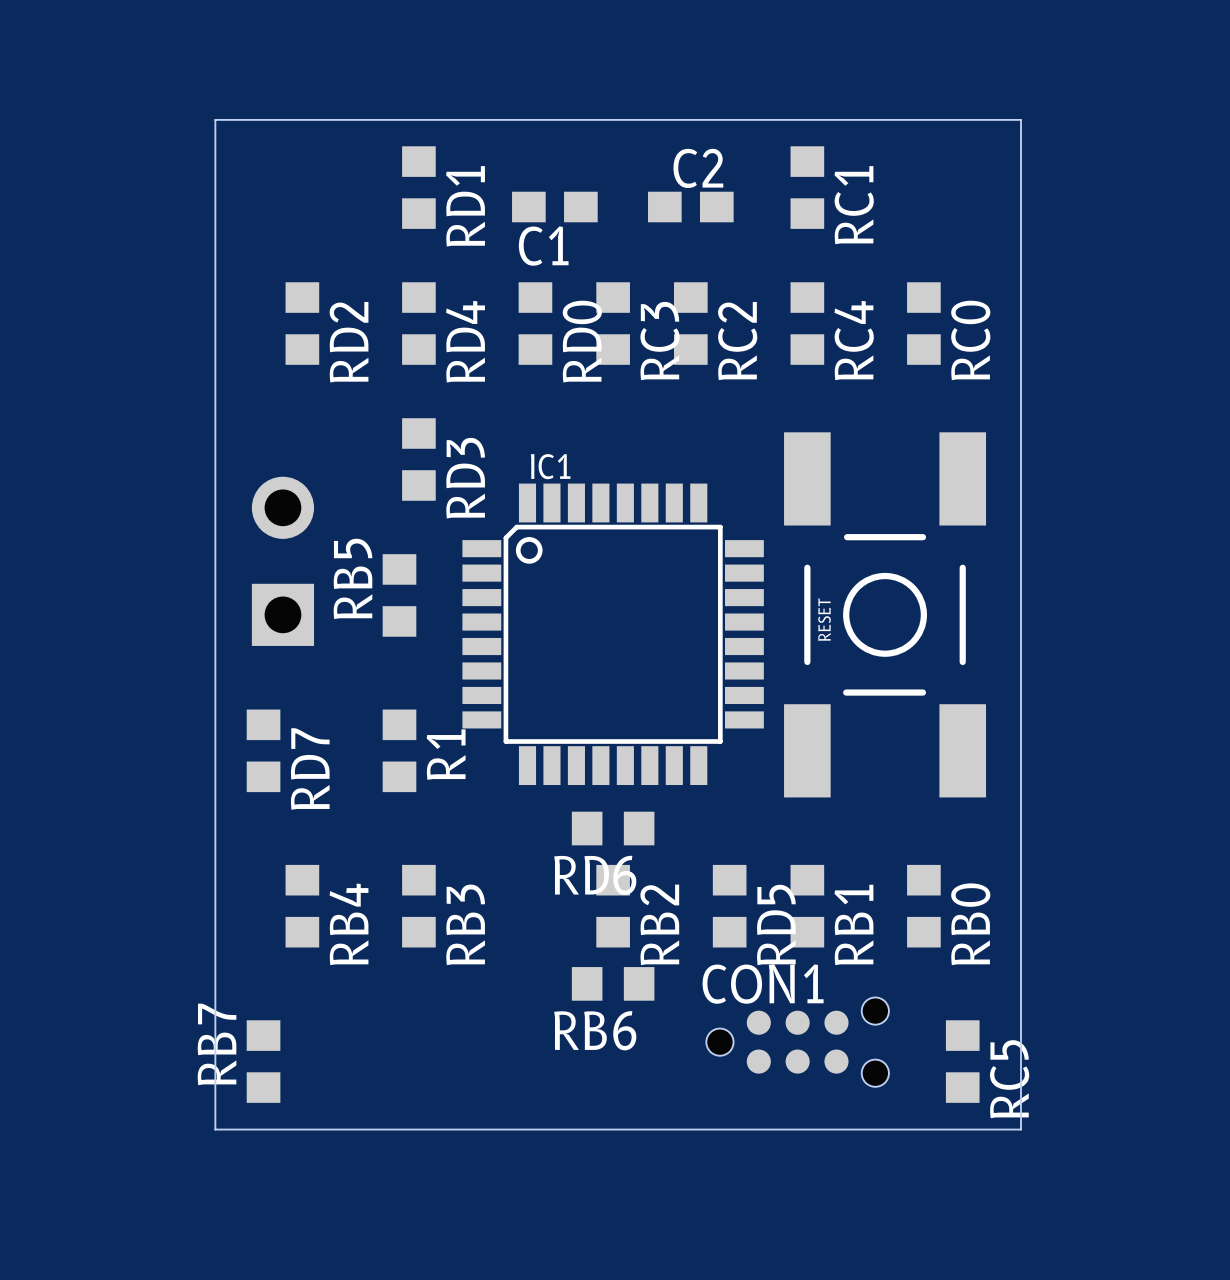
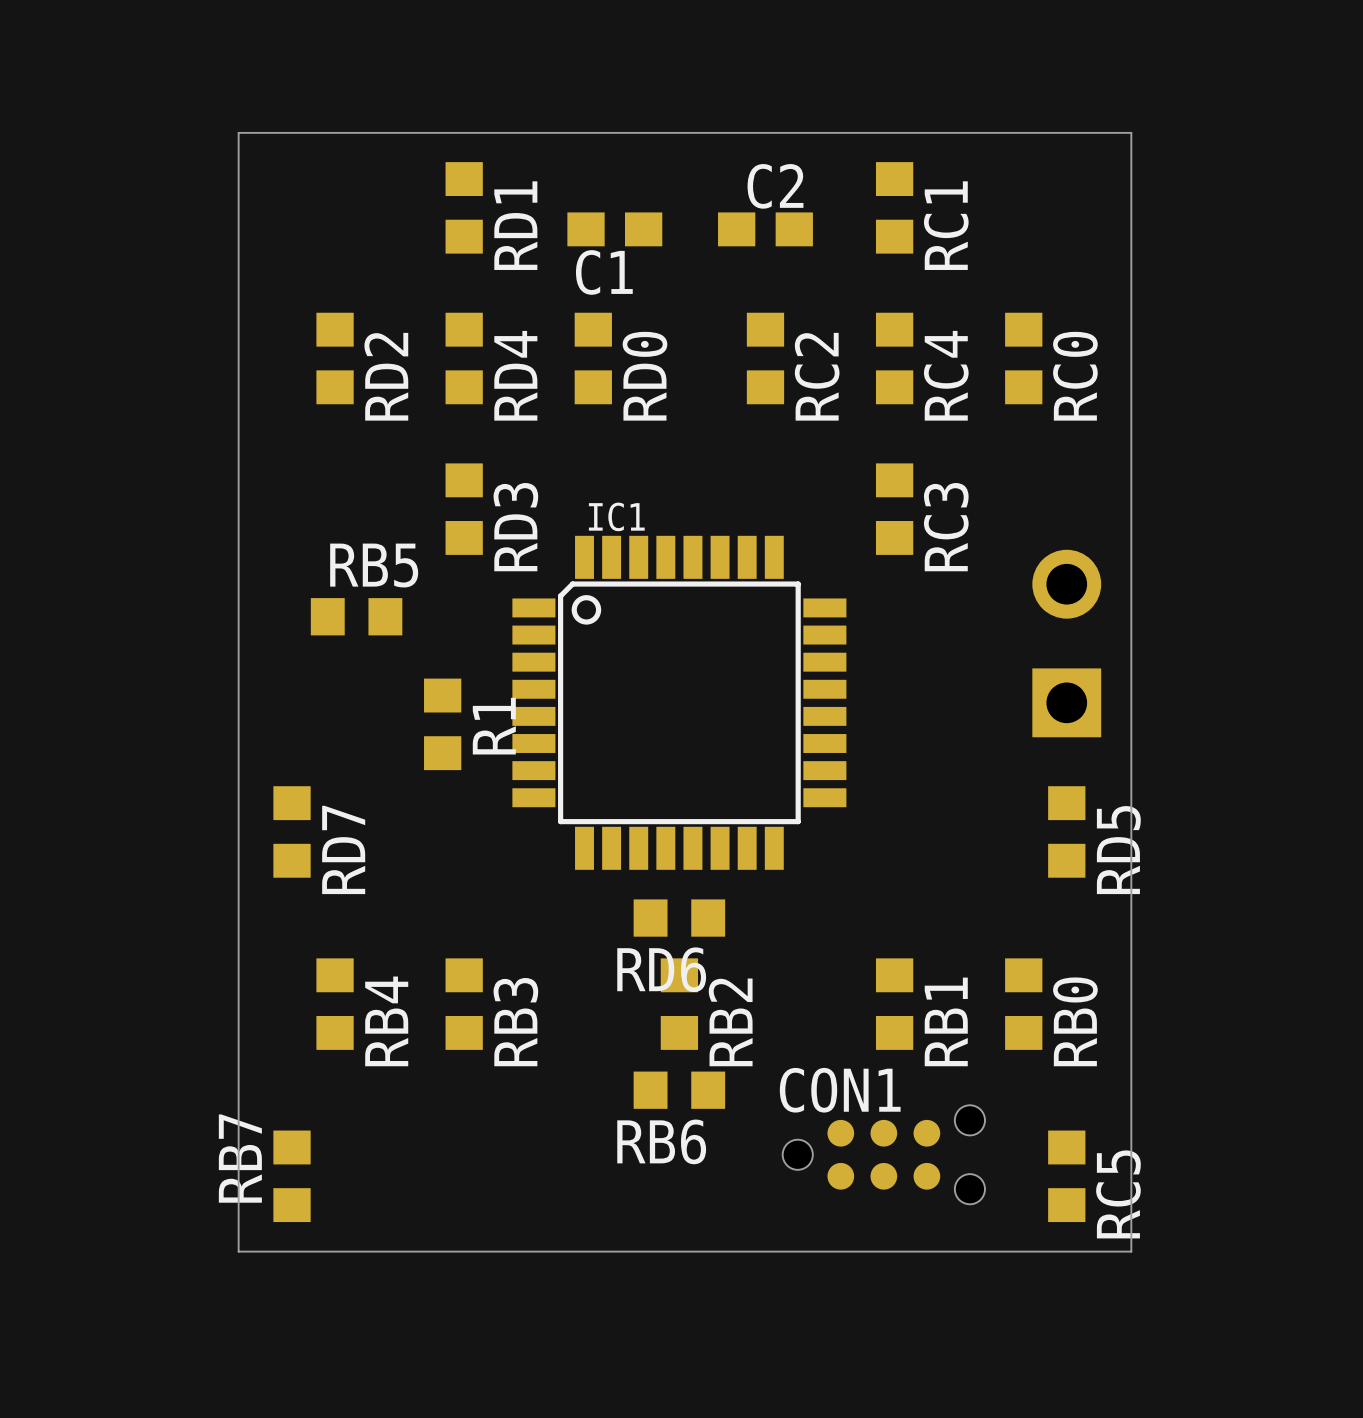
RC3 position: (613, 323) -> (894, 509)
part position: (282, 561) -> (1066, 643)
RB5 rotation: 0° (399, 595) -> 90° clockwise (356, 616)
RB5 position: (399, 595) -> (356, 616)
RESET: (885, 614) -> none
R1 position: (399, 750) -> (442, 724)
RD5 position: (729, 906) -> (1066, 831)

